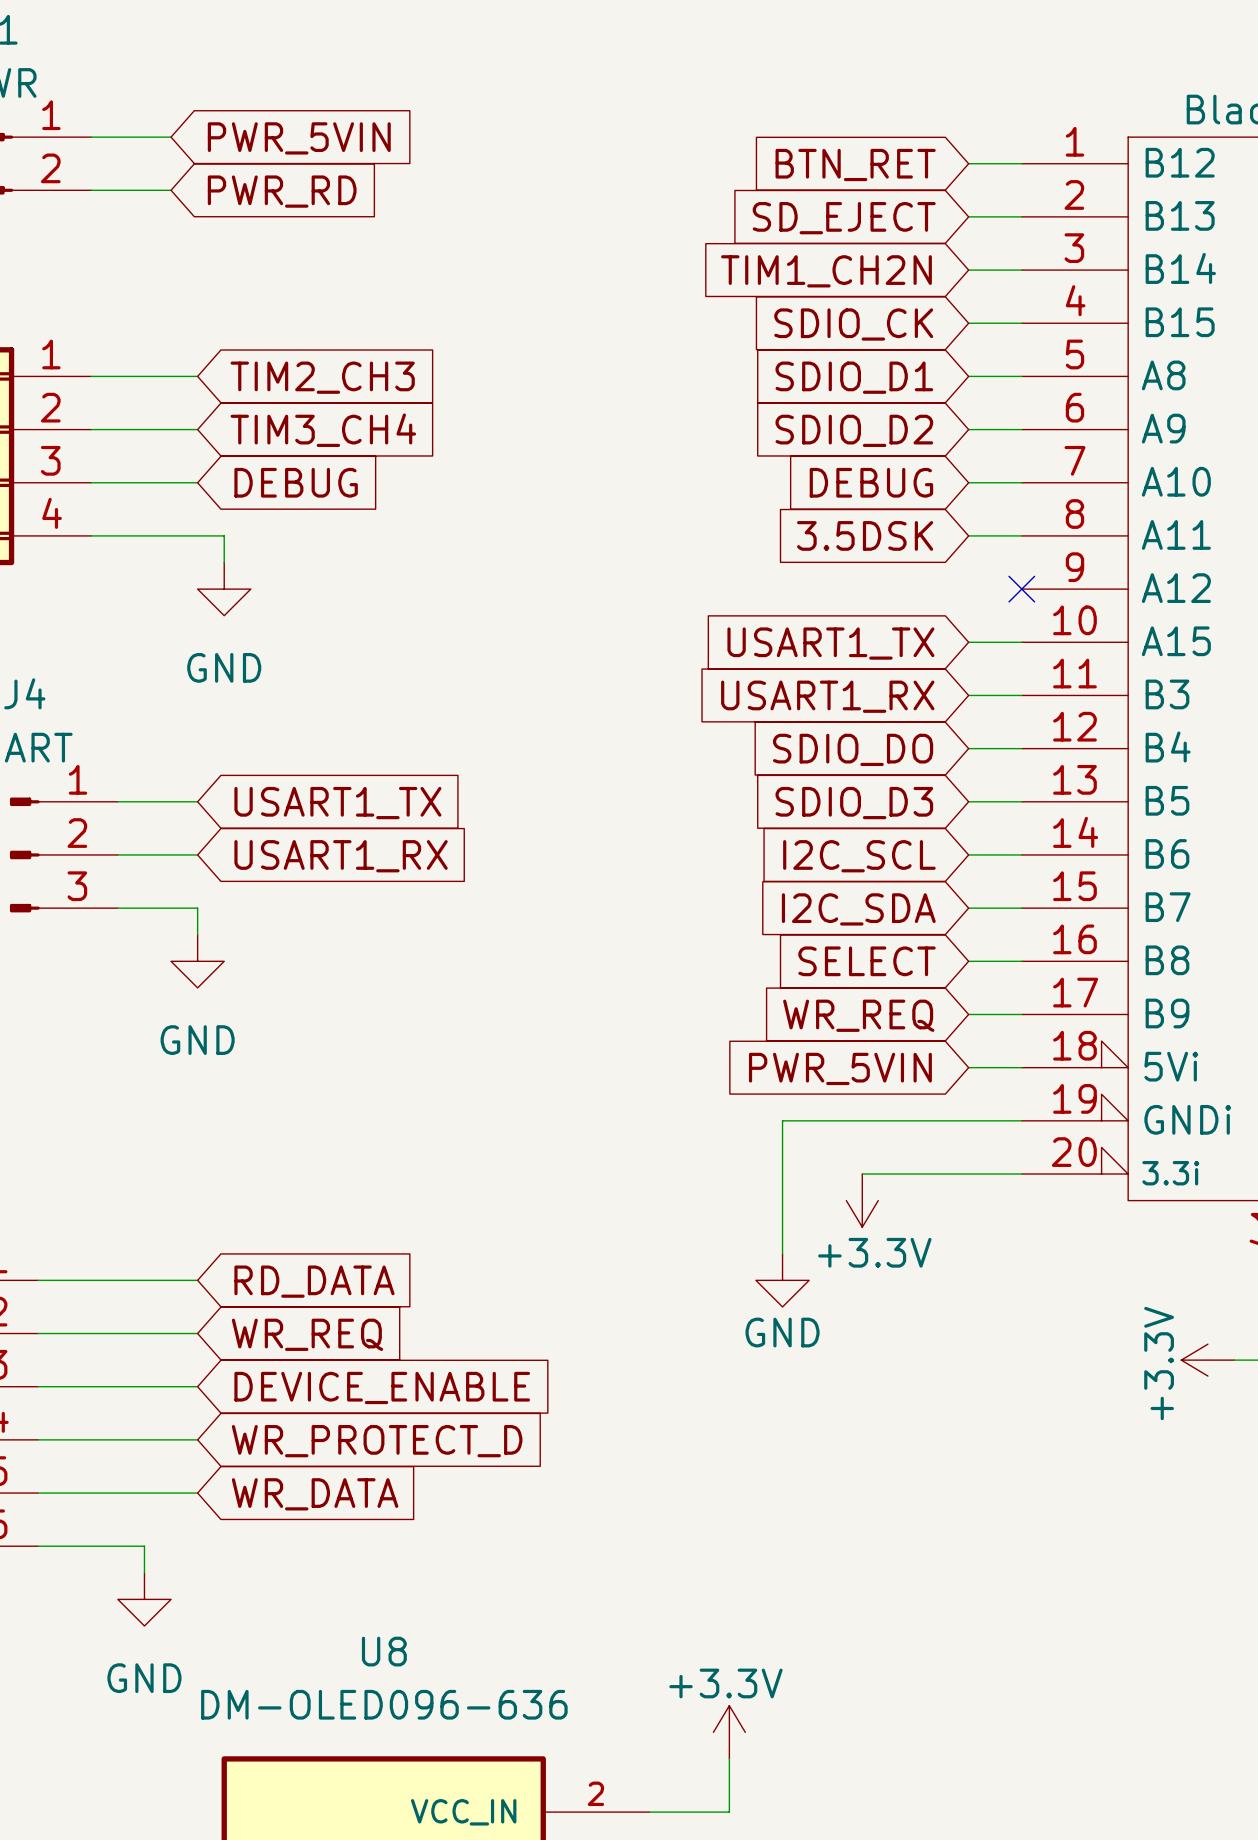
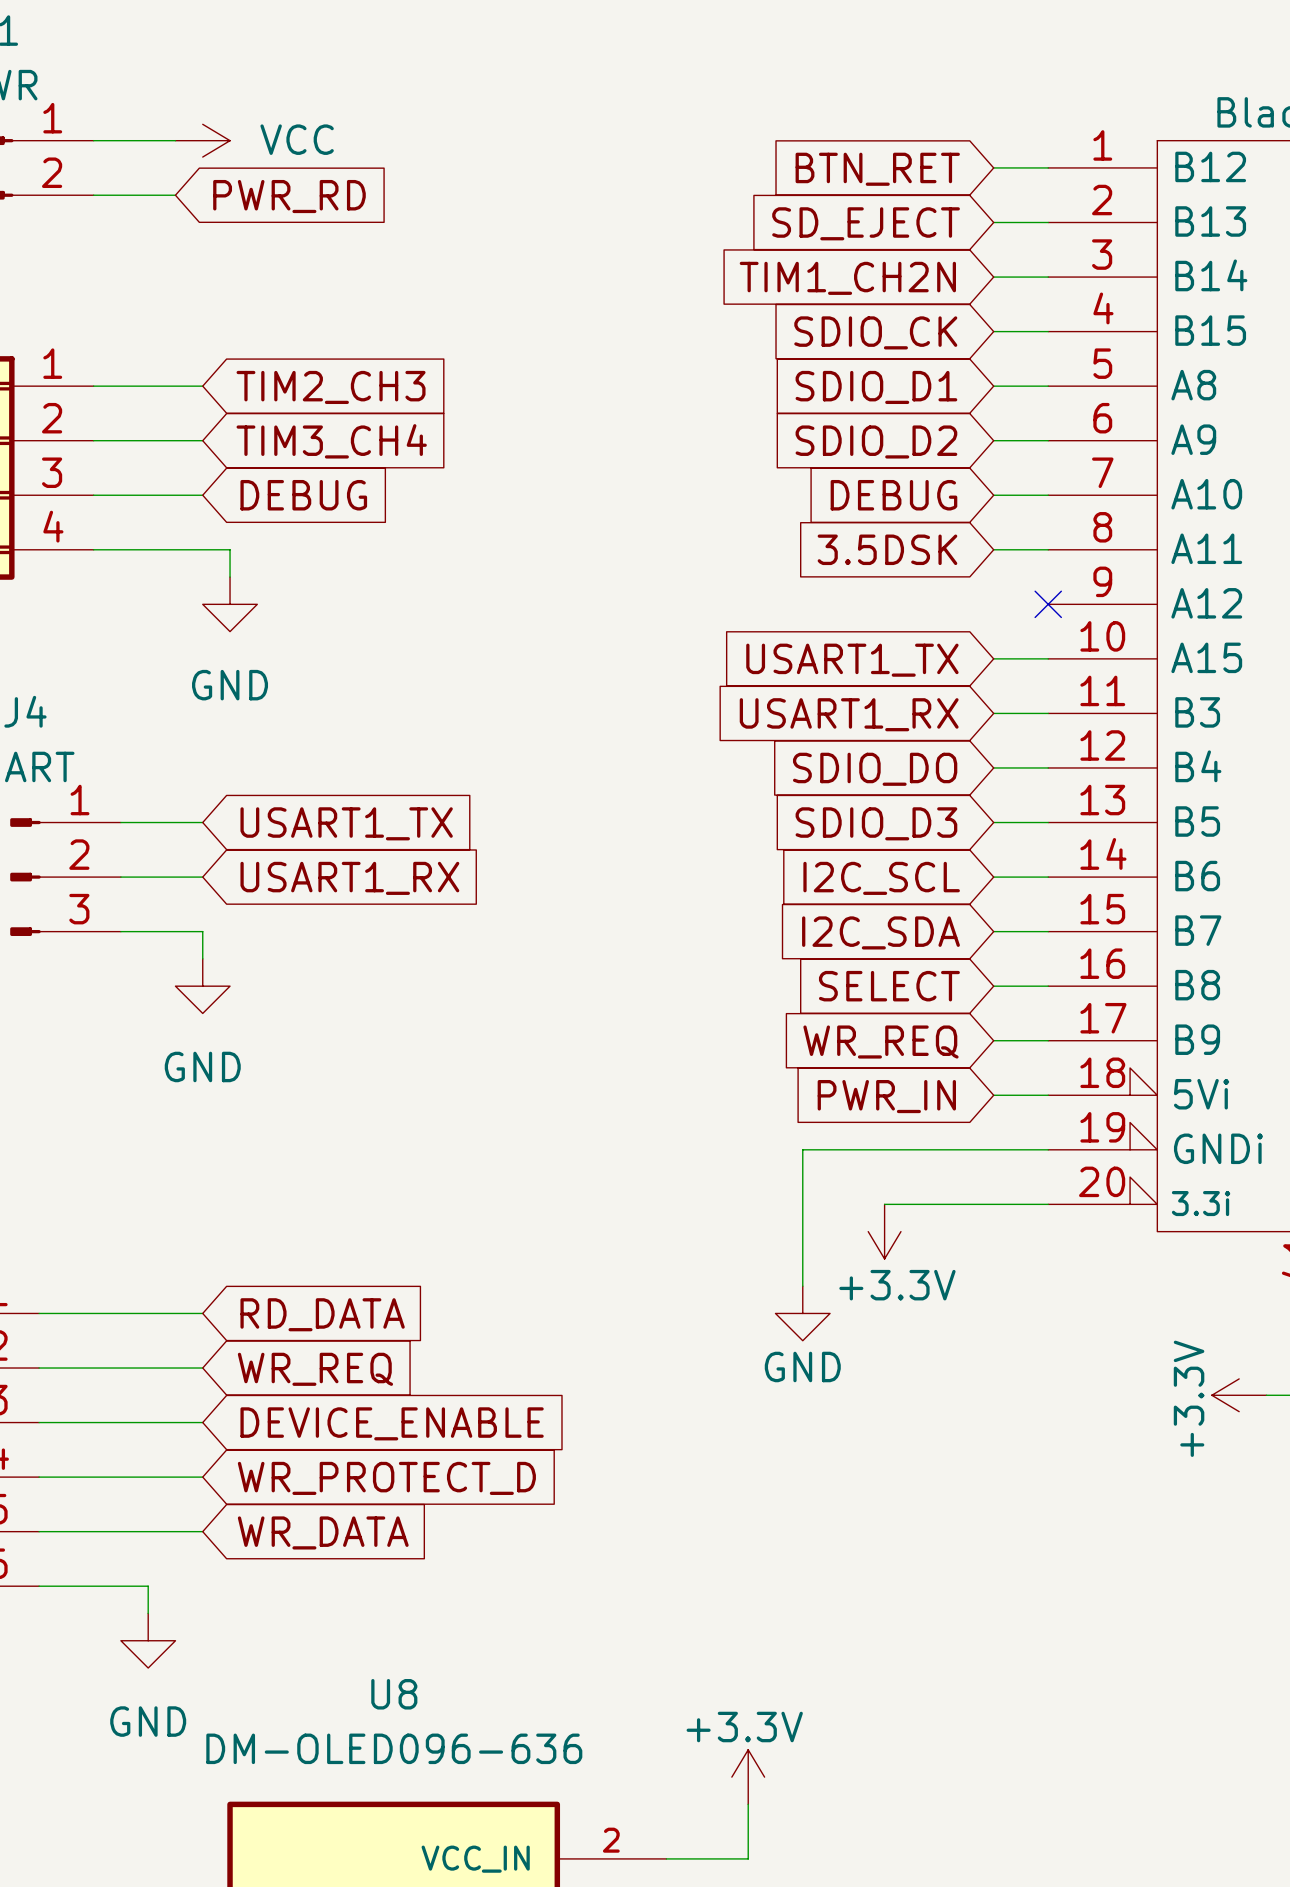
power symbol: none -> VCC (202, 140)
global label: PWR_5VIN (299, 138) -> none
global label: PWR_5VIN (840, 1068) -> PWR_IN (886, 1096)

